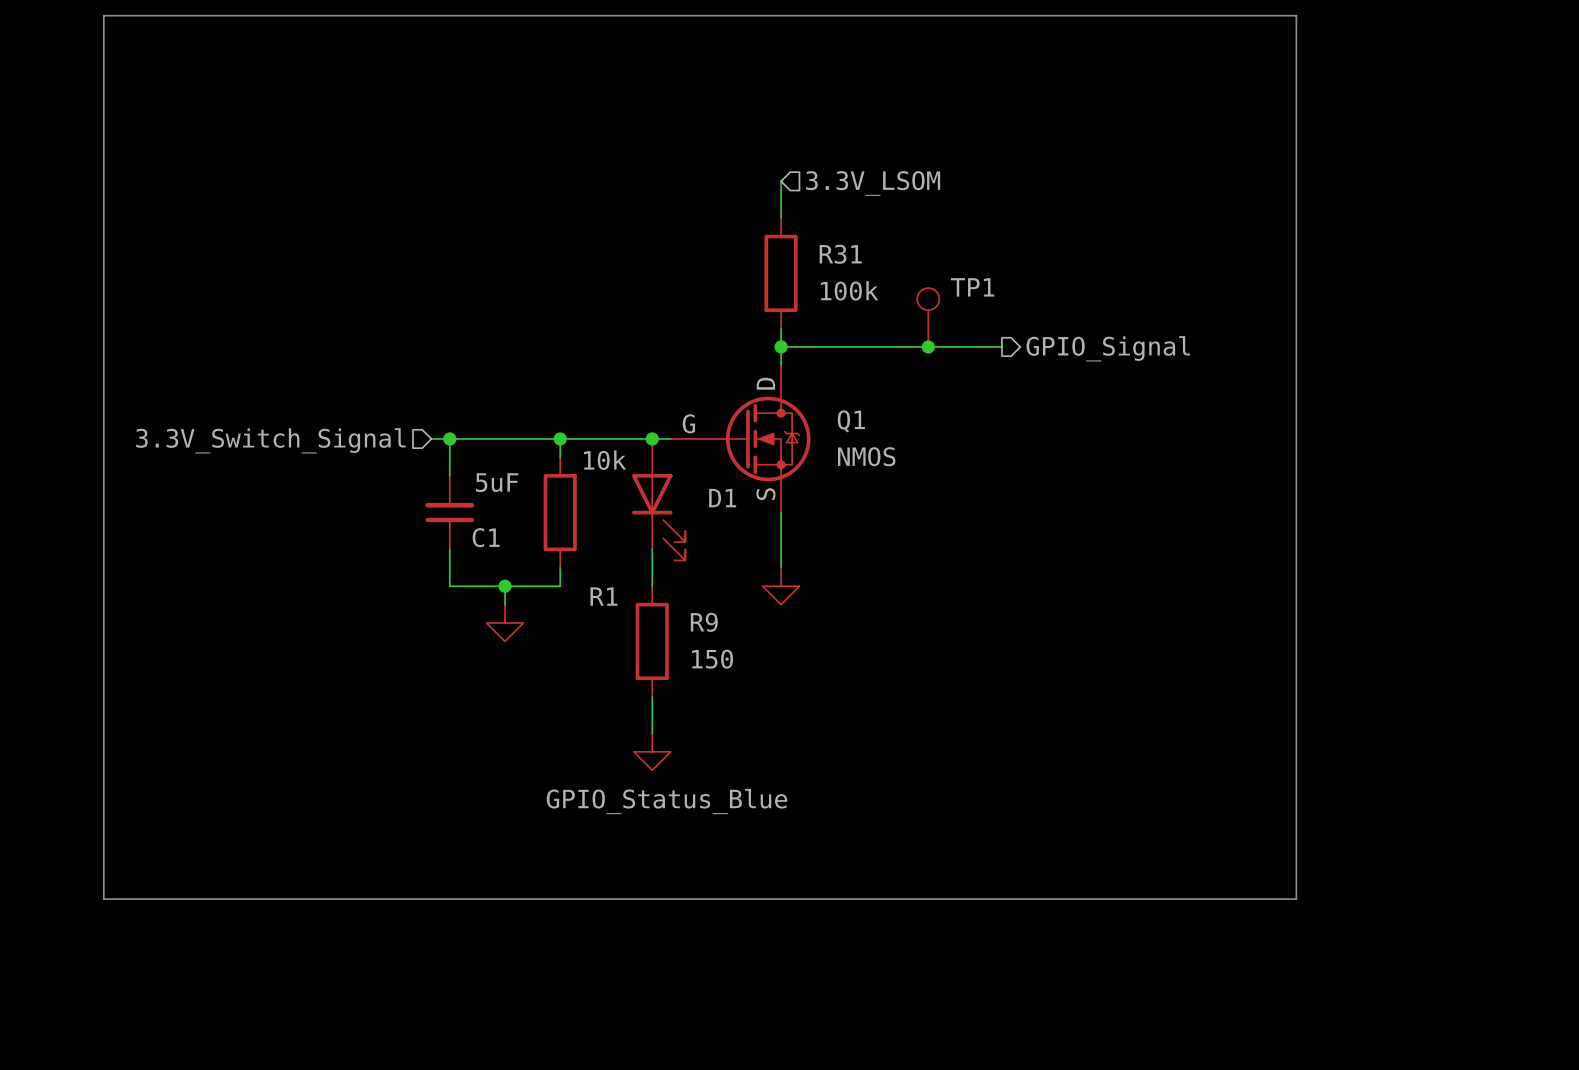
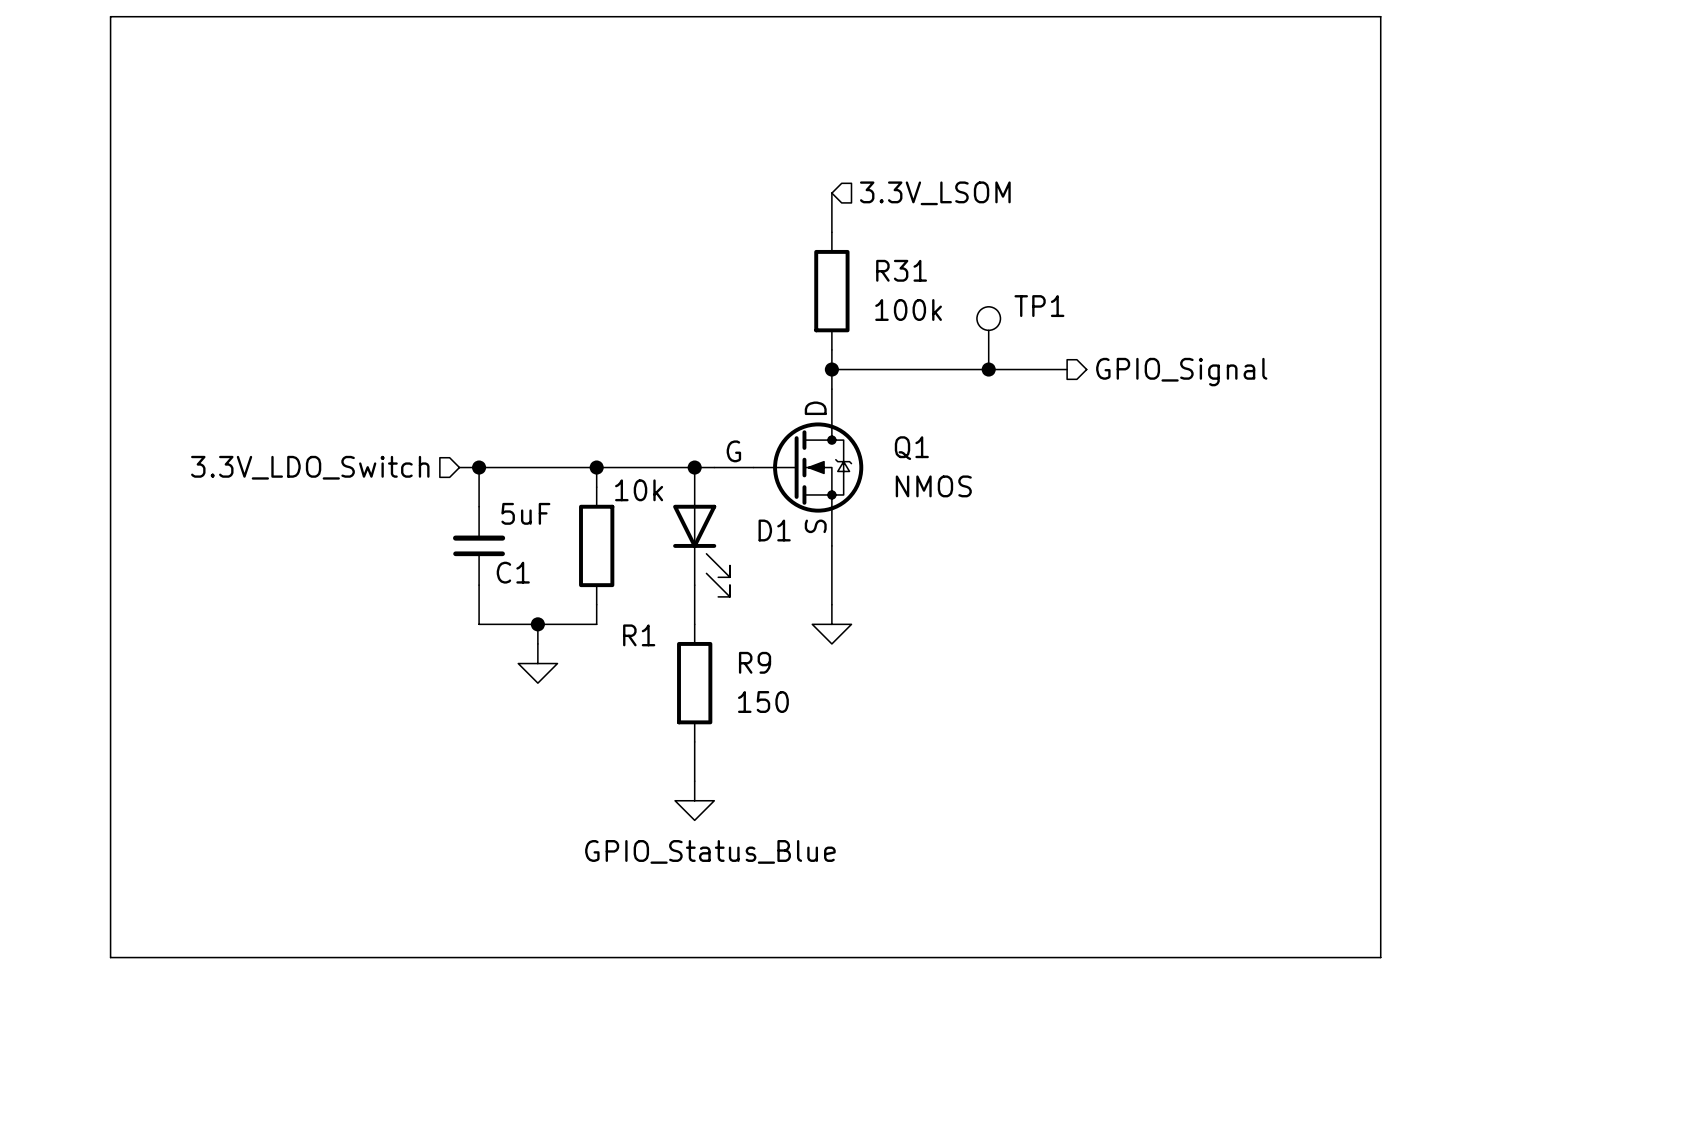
hierarchical label: 3.3V_Switch_Signal (270, 440) -> 3.3V_LDO_Switch (310, 467)

